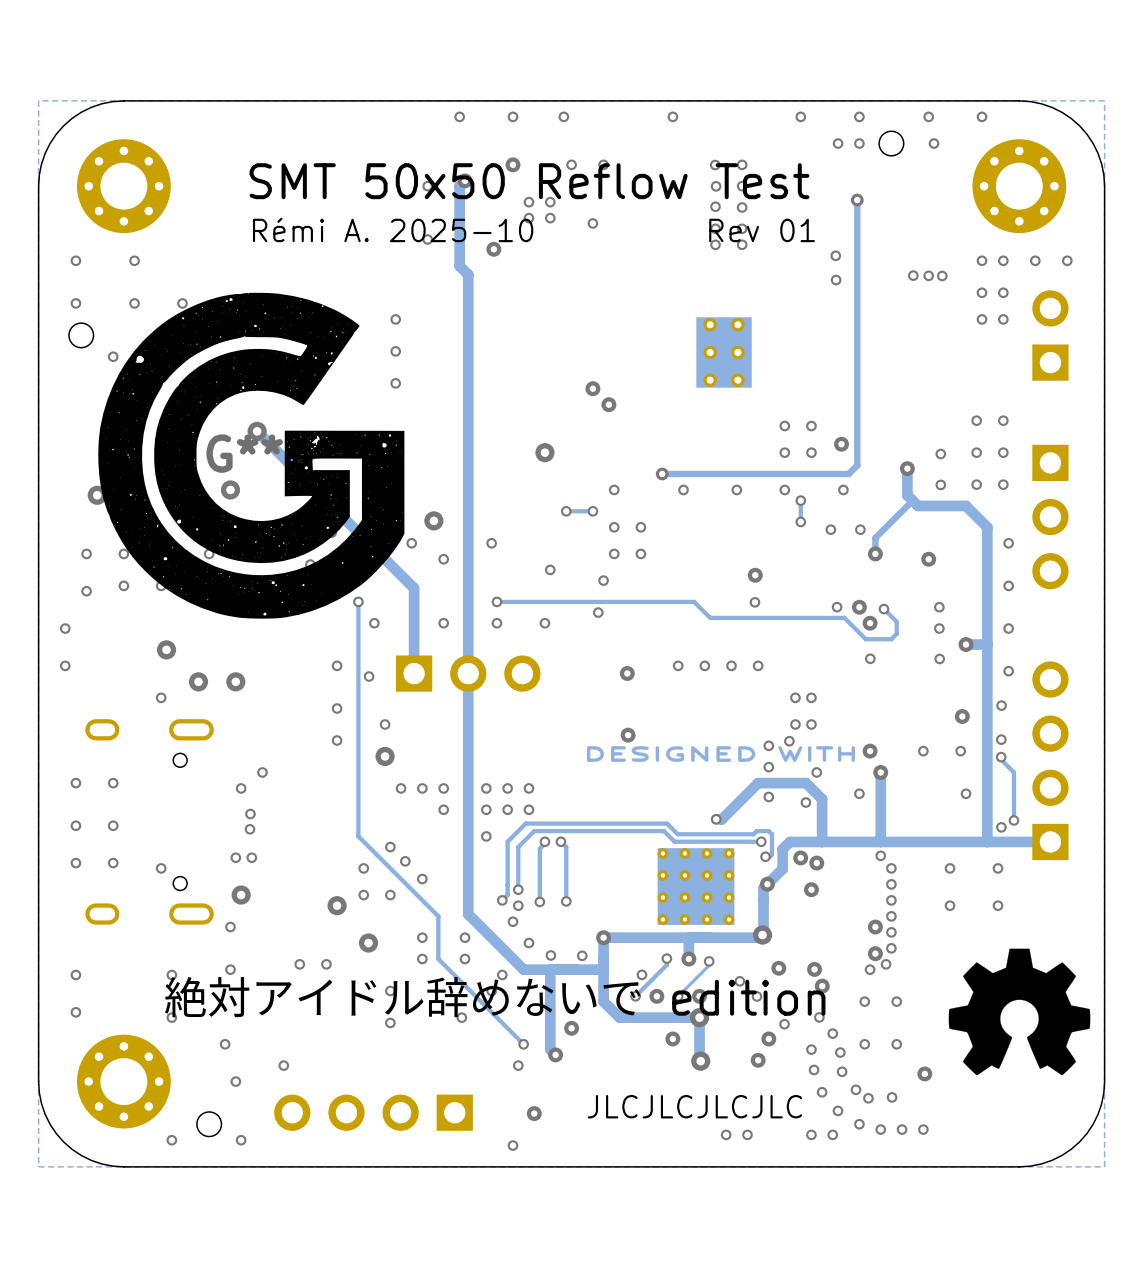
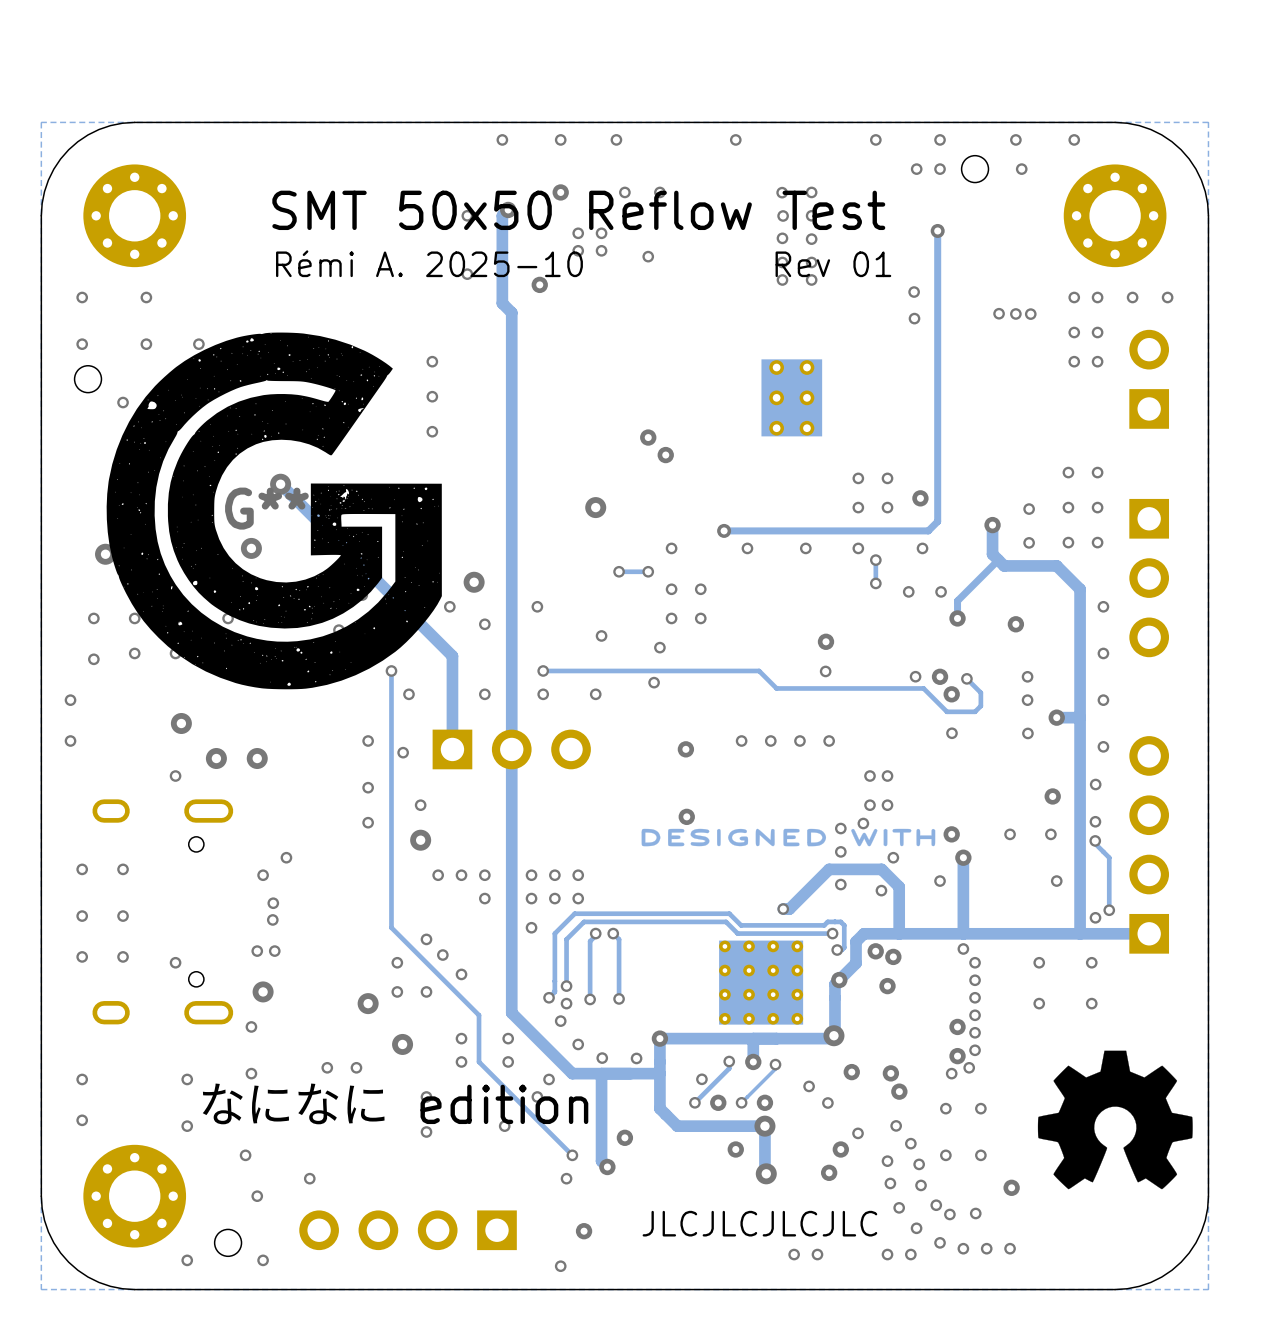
text: 絶対アイドル辞めないで edition (494, 997) -> なになに edition (394, 1103)

